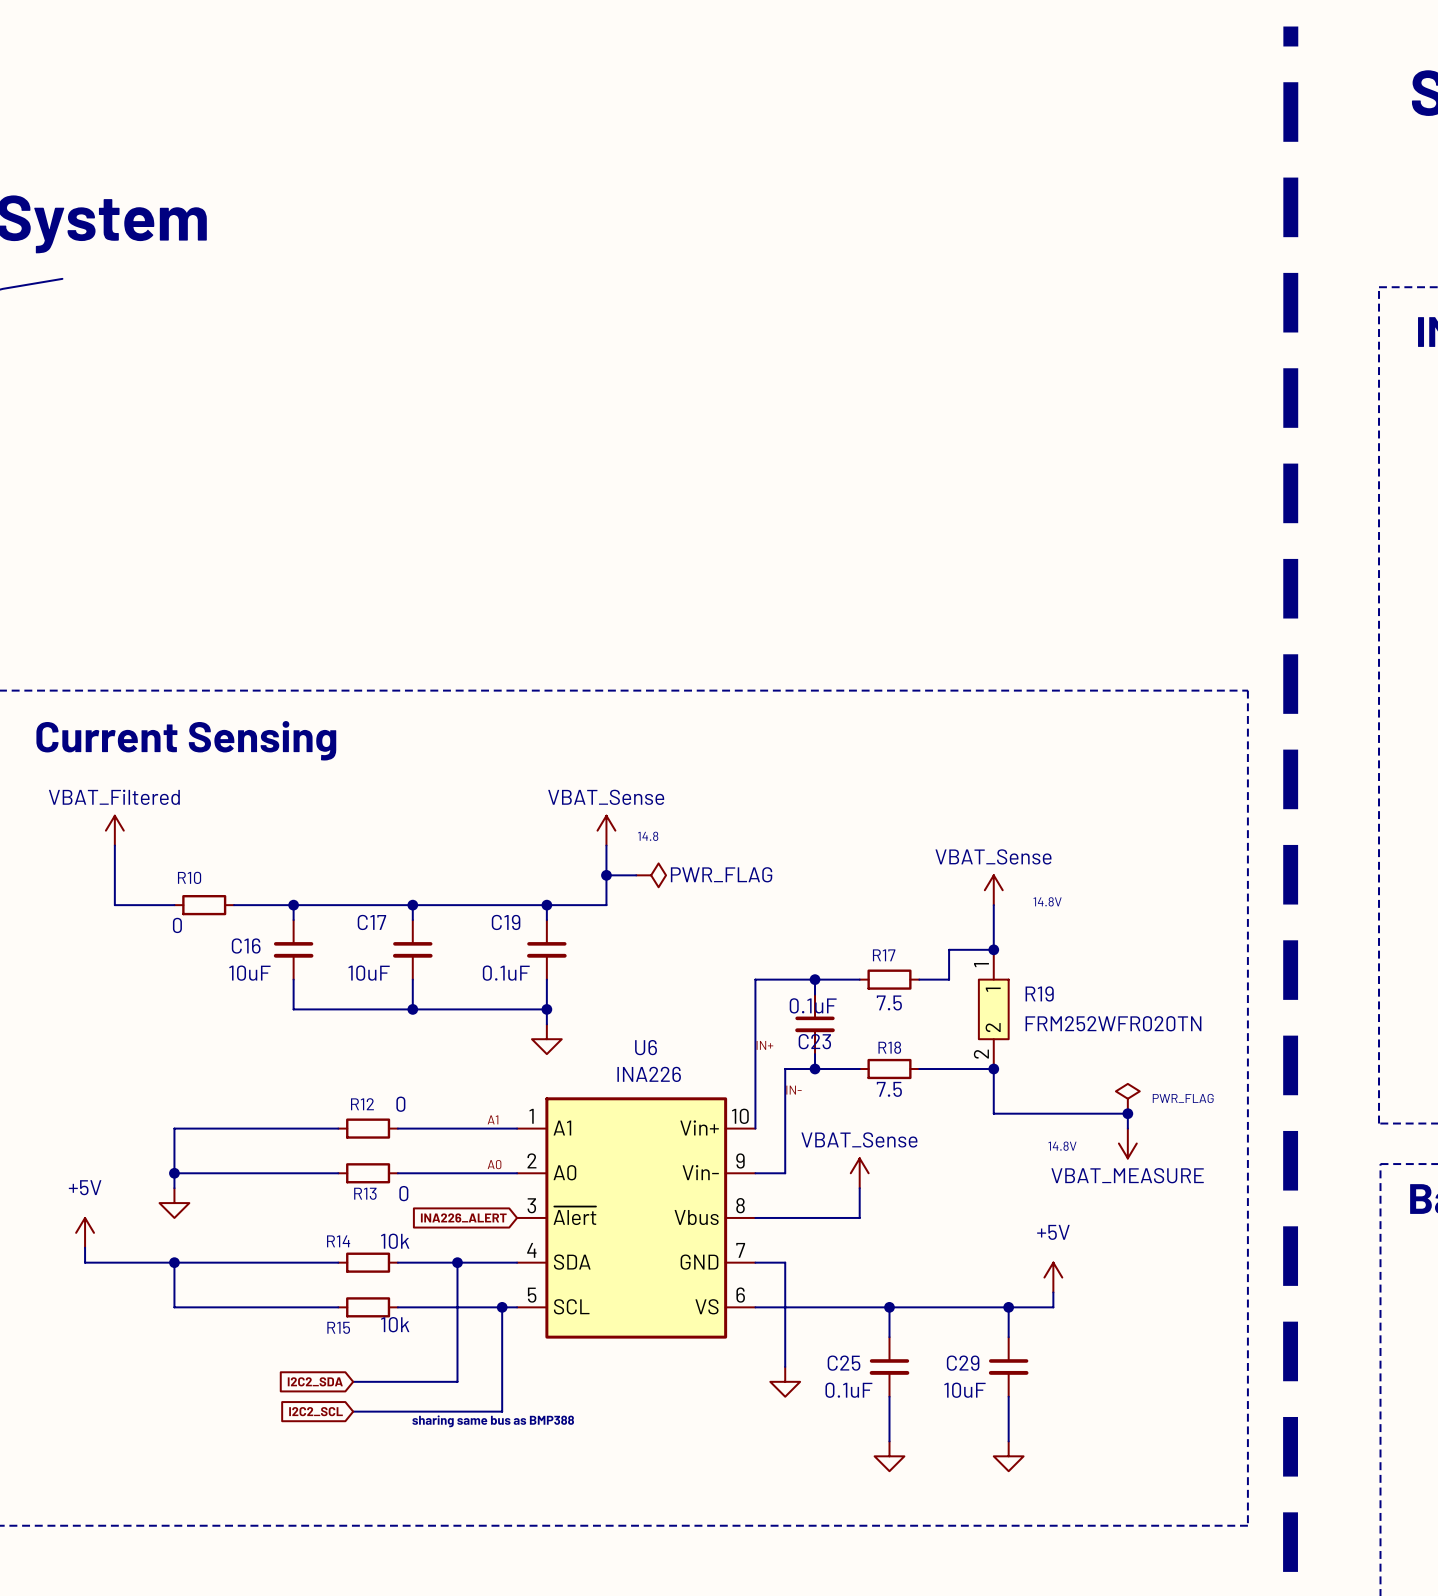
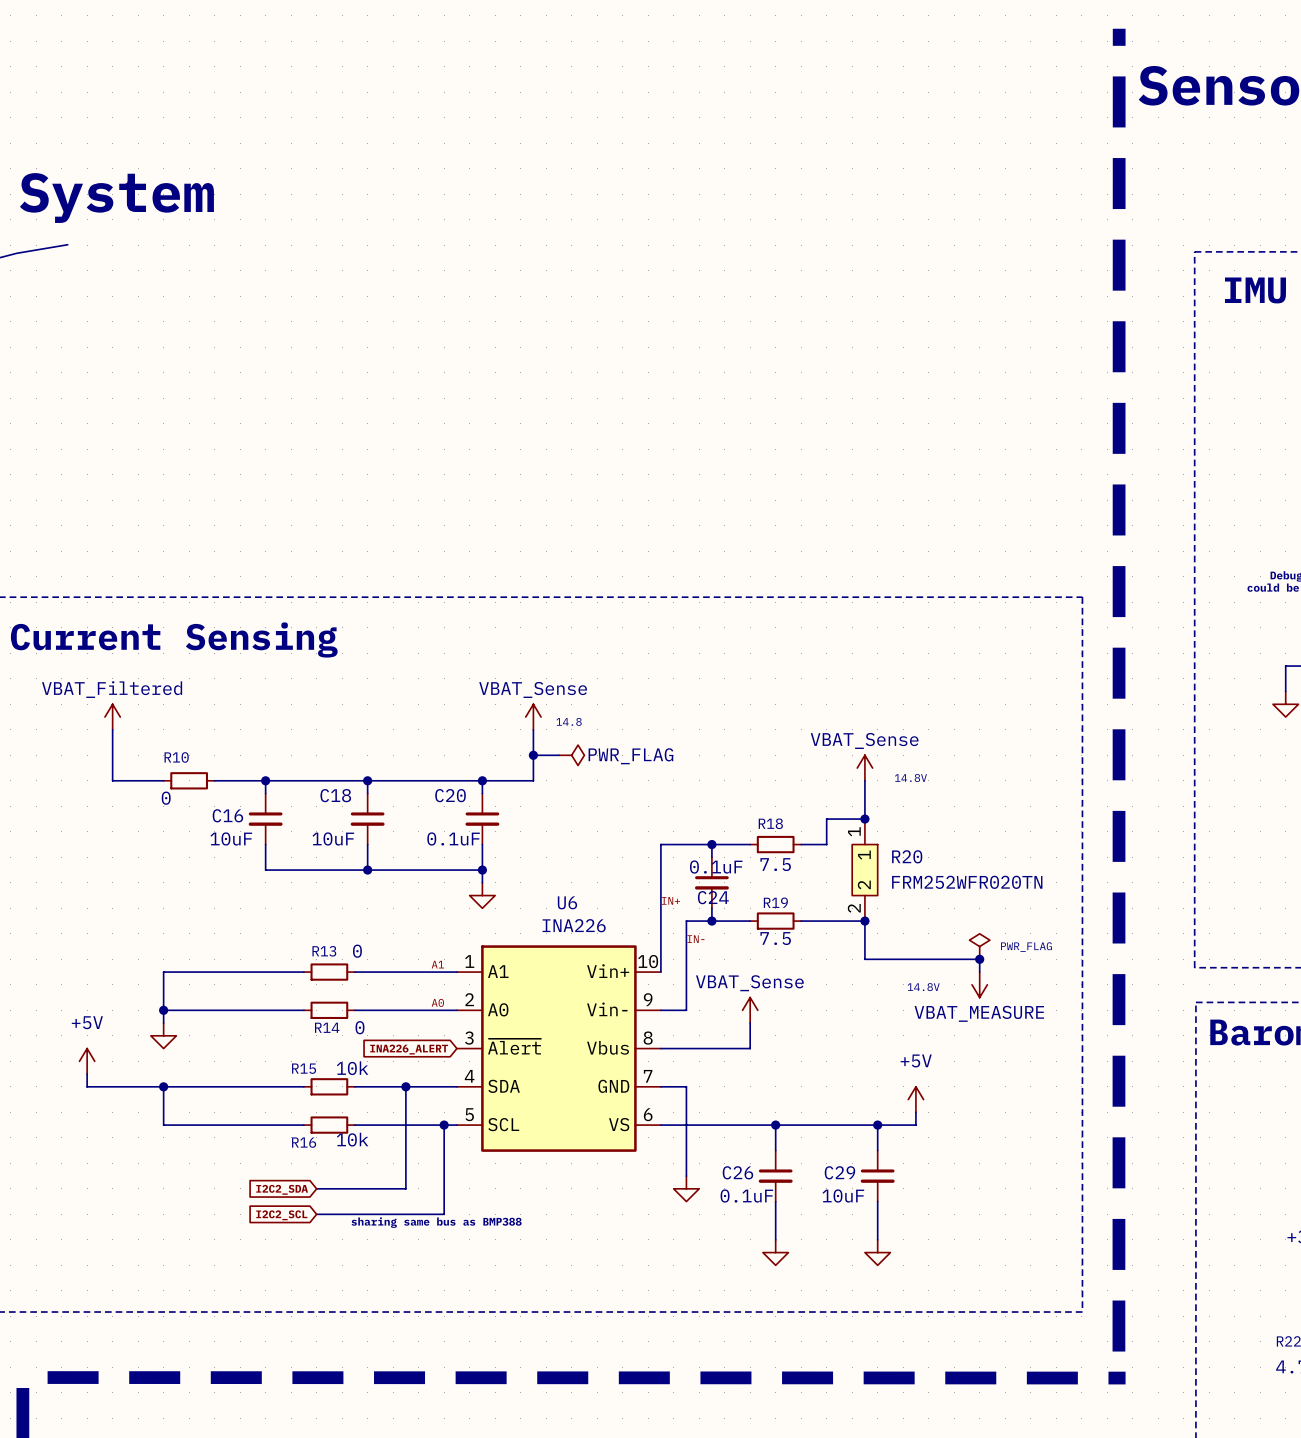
C17 name: C17 (371, 922) -> C18 (335, 795)
C19 name: C19 (506, 922) -> C20 (450, 795)
R17 name: R17 (884, 955) -> R18 (770, 823)
R19 name: R19 (1039, 993) -> R20 (907, 856)
C23 name: C23 (814, 1041) -> C24 (713, 897)
R18 name: R18 (889, 1047) -> R19 (775, 902)
R12 name: R12 (362, 1104) -> R13 (324, 951)
R13 name: R13 (365, 1193) -> R14 (327, 1027)
R14 name: R14 (338, 1241) -> R15 (304, 1068)
R15 name: R15 (338, 1327) -> R16 (304, 1142)
C25 name: C25 (844, 1363) -> C26 (737, 1172)

